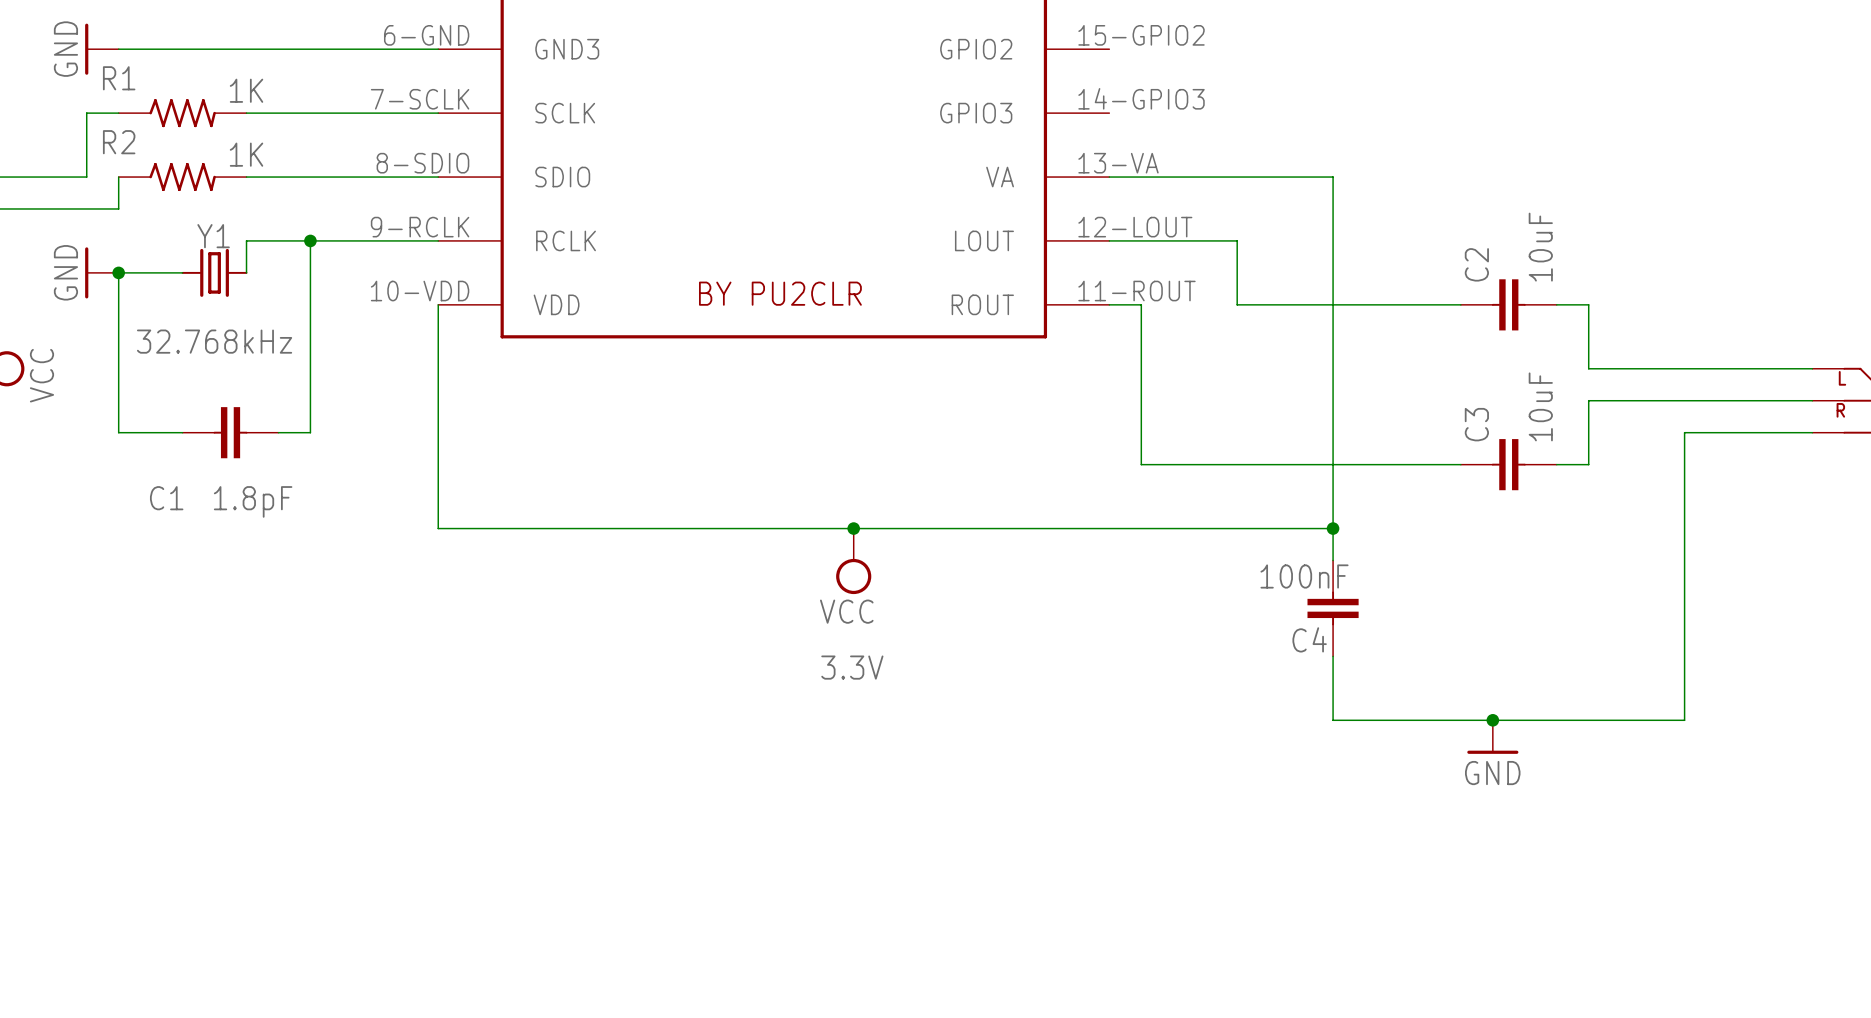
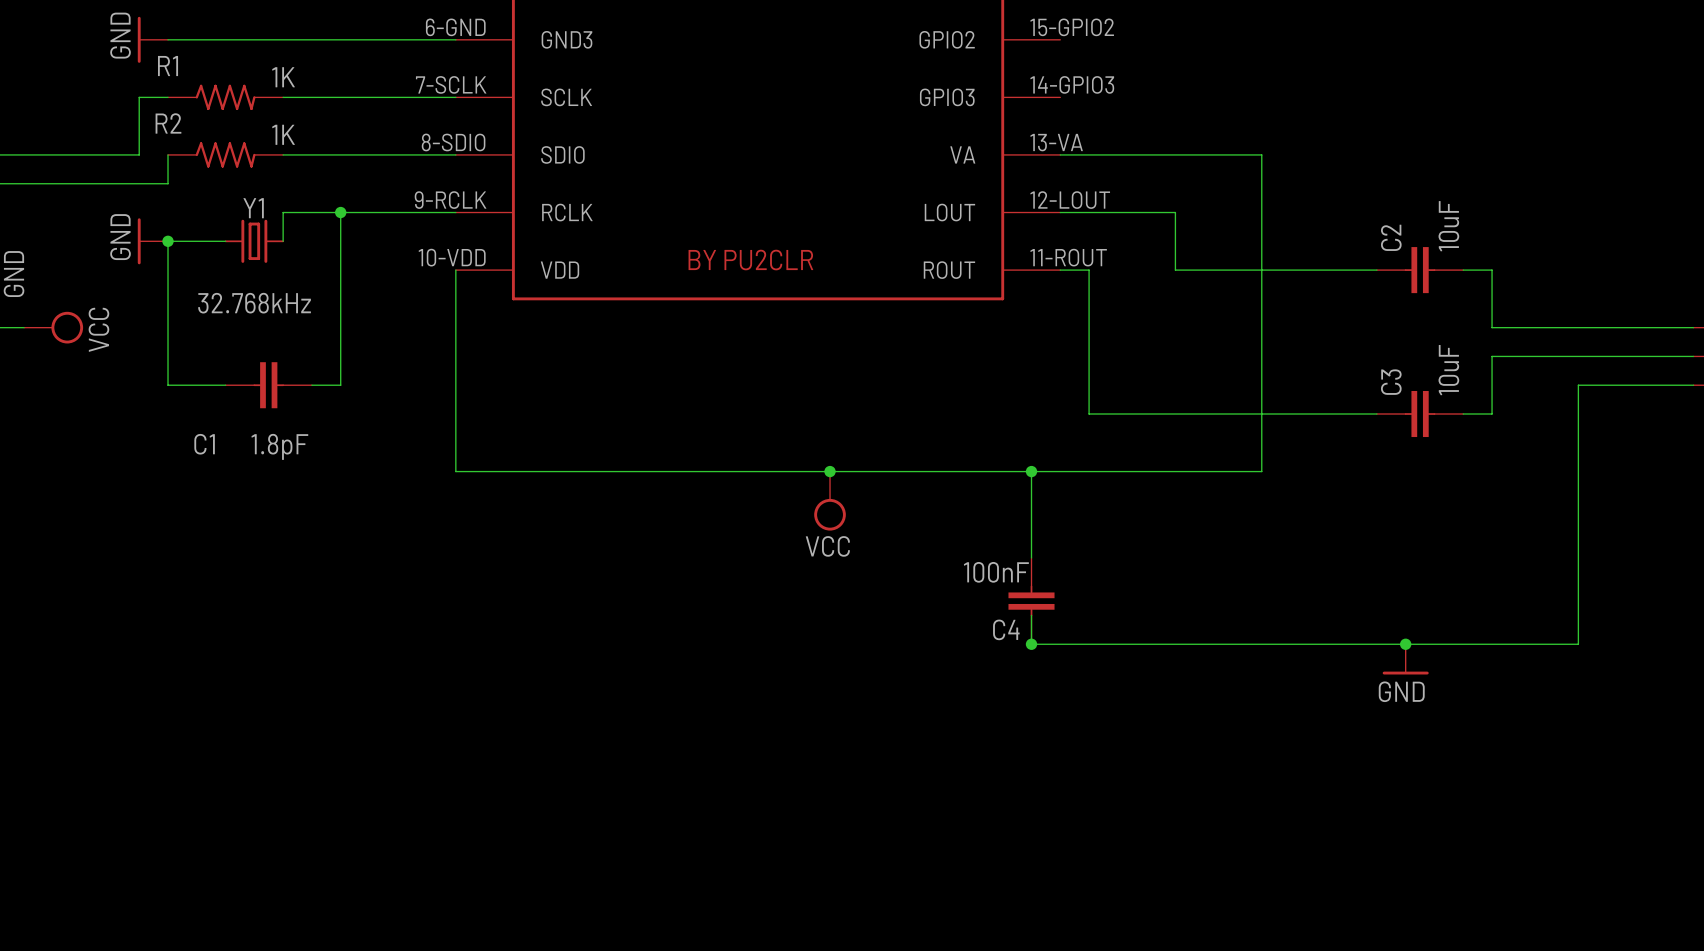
wire: none -> (1031, 471) (1031, 557)
junction: none -> (1031, 471)
wire: (1333, 528) (1333, 560) -> none
junction: (1333, 528) -> none
C4 position: (1333, 608) -> (1031, 601)
wire: (1333, 656) (1333, 720) -> (1031, 615) (1031, 644) (1261, 644)
power symbol text: 3.3V (852, 667) -> none
junction: none -> (1031, 644)

